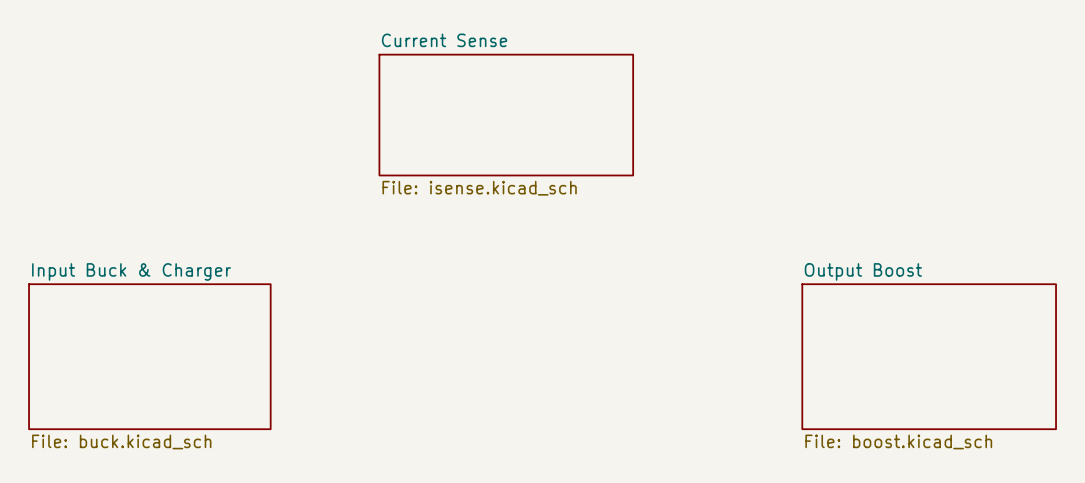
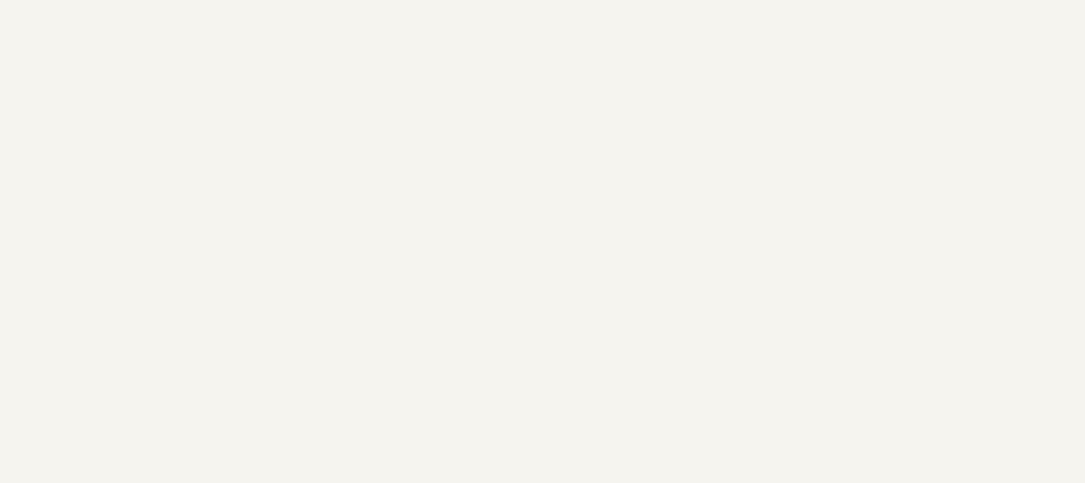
sheet Current Sense: File: isense.kicad_sch (506, 115) -> none
sheet Input Buck & Charger: File: buck.kicad_sch (149, 356) -> none
sheet Output Boost: File: boost.kicad_sch (929, 356) -> none

